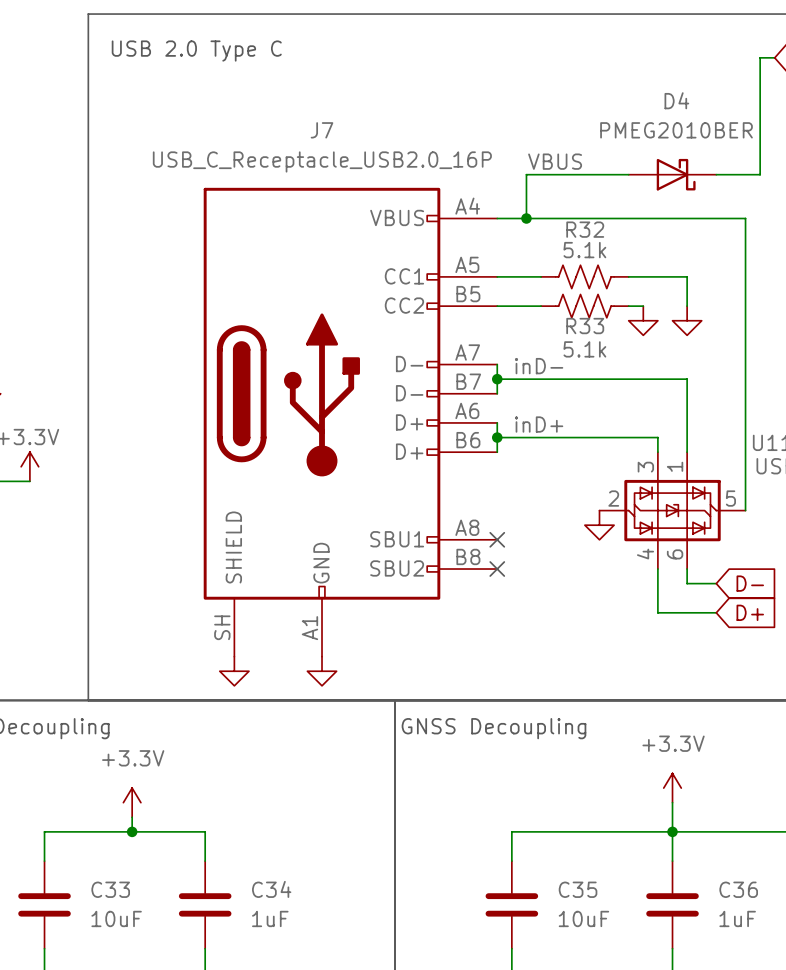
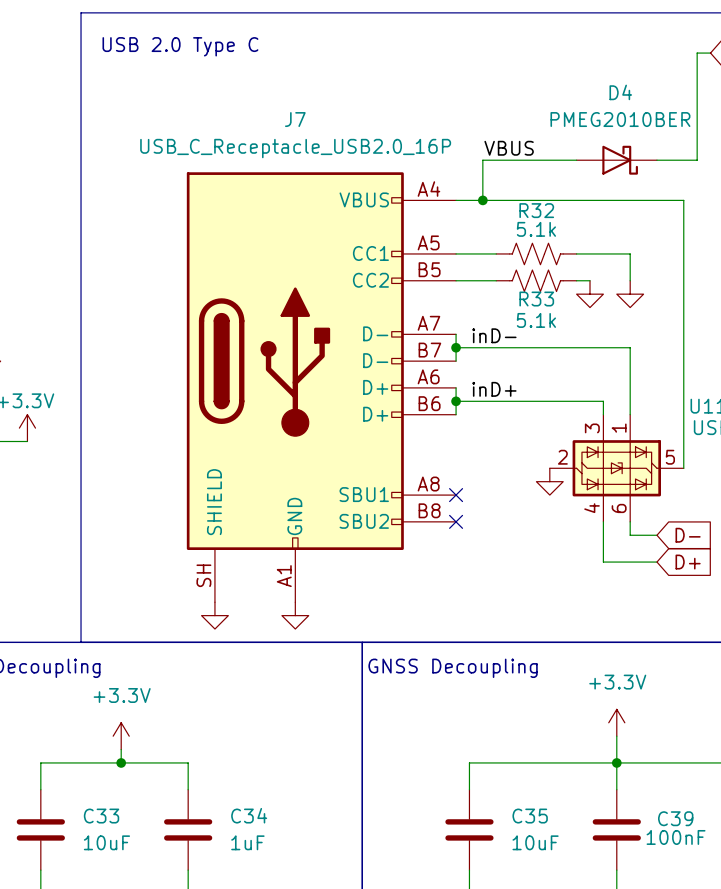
C36 name: C36 (738, 889) -> C39 (675, 818)
C36 value: 1uF (737, 918) -> 100nF (676, 837)

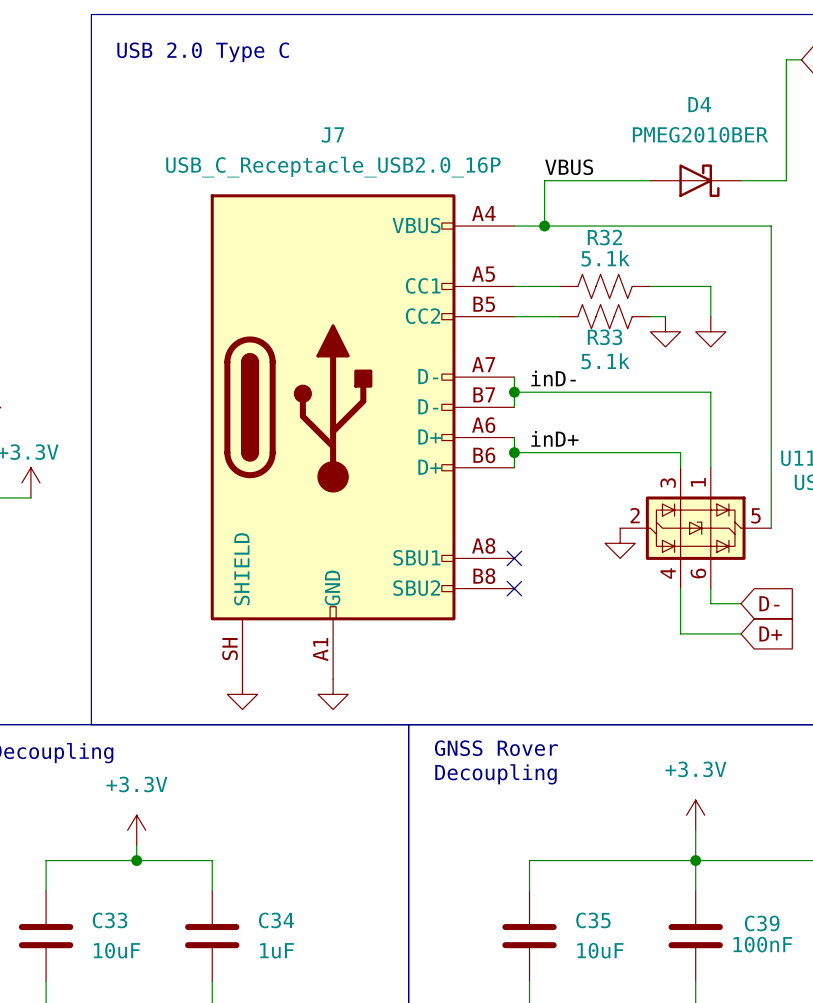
text: none -> GNSS Rover (496, 748)
text: GNSS Decoupling (453, 668) -> Decoupling (495, 774)

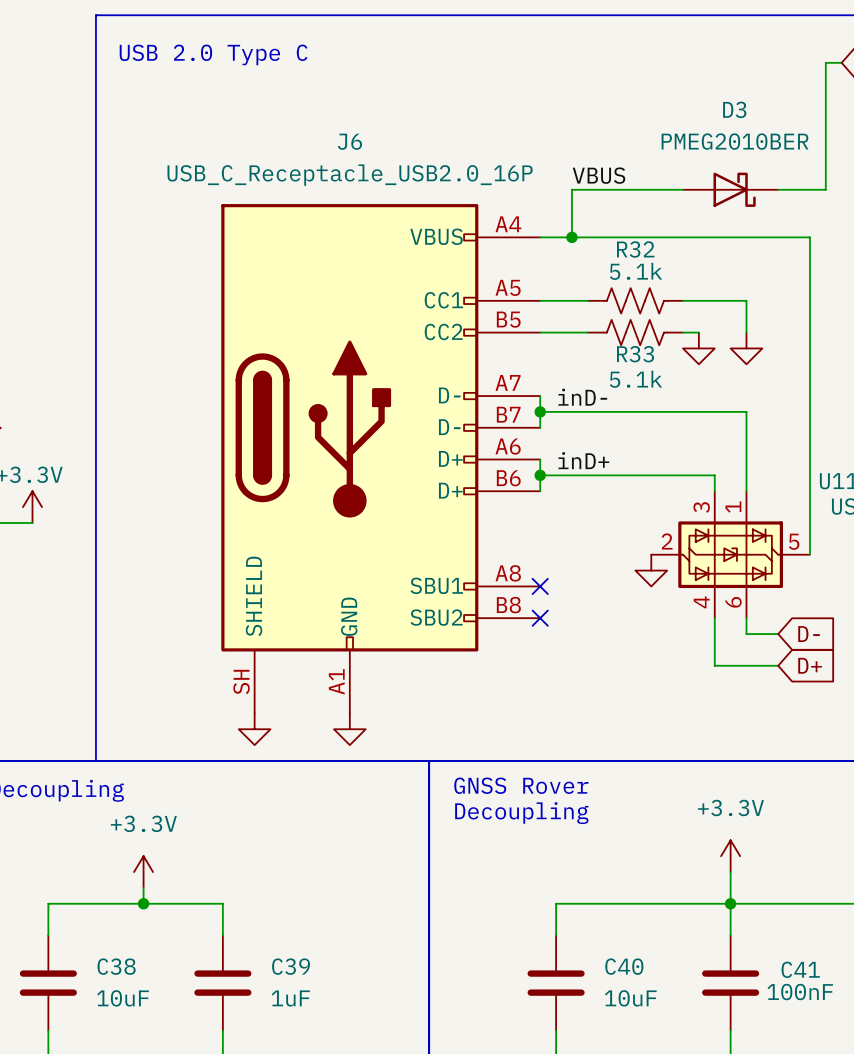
D4 name: D4 (699, 104) -> D3 (734, 109)
J7 name: J7 (332, 134) -> J6 (349, 141)
C33 name: C33 (110, 920) -> C38 (116, 966)
C34 name: C34 (276, 920) -> C39 (291, 966)
C35 name: C35 (593, 920) -> C40 (624, 966)
C39 name: C39 (762, 923) -> C41 (800, 969)

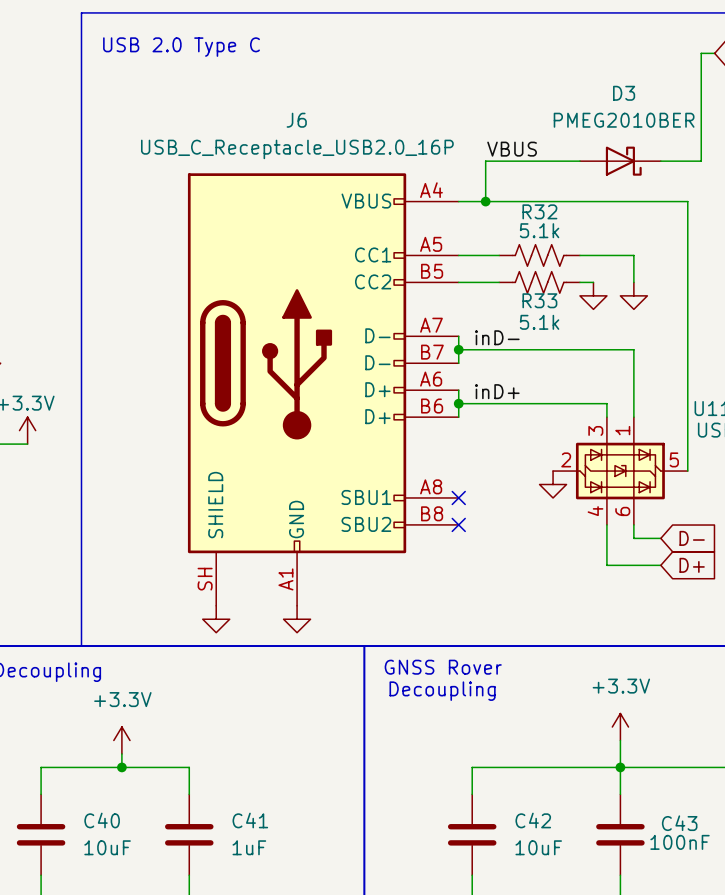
C38 name: C38 (116, 966) -> C40 (102, 820)
C39 name: C39 (291, 966) -> C41 (250, 820)
C40 name: C40 (624, 966) -> C42 (533, 820)
C41 name: C41 (800, 969) -> C43 (679, 823)

